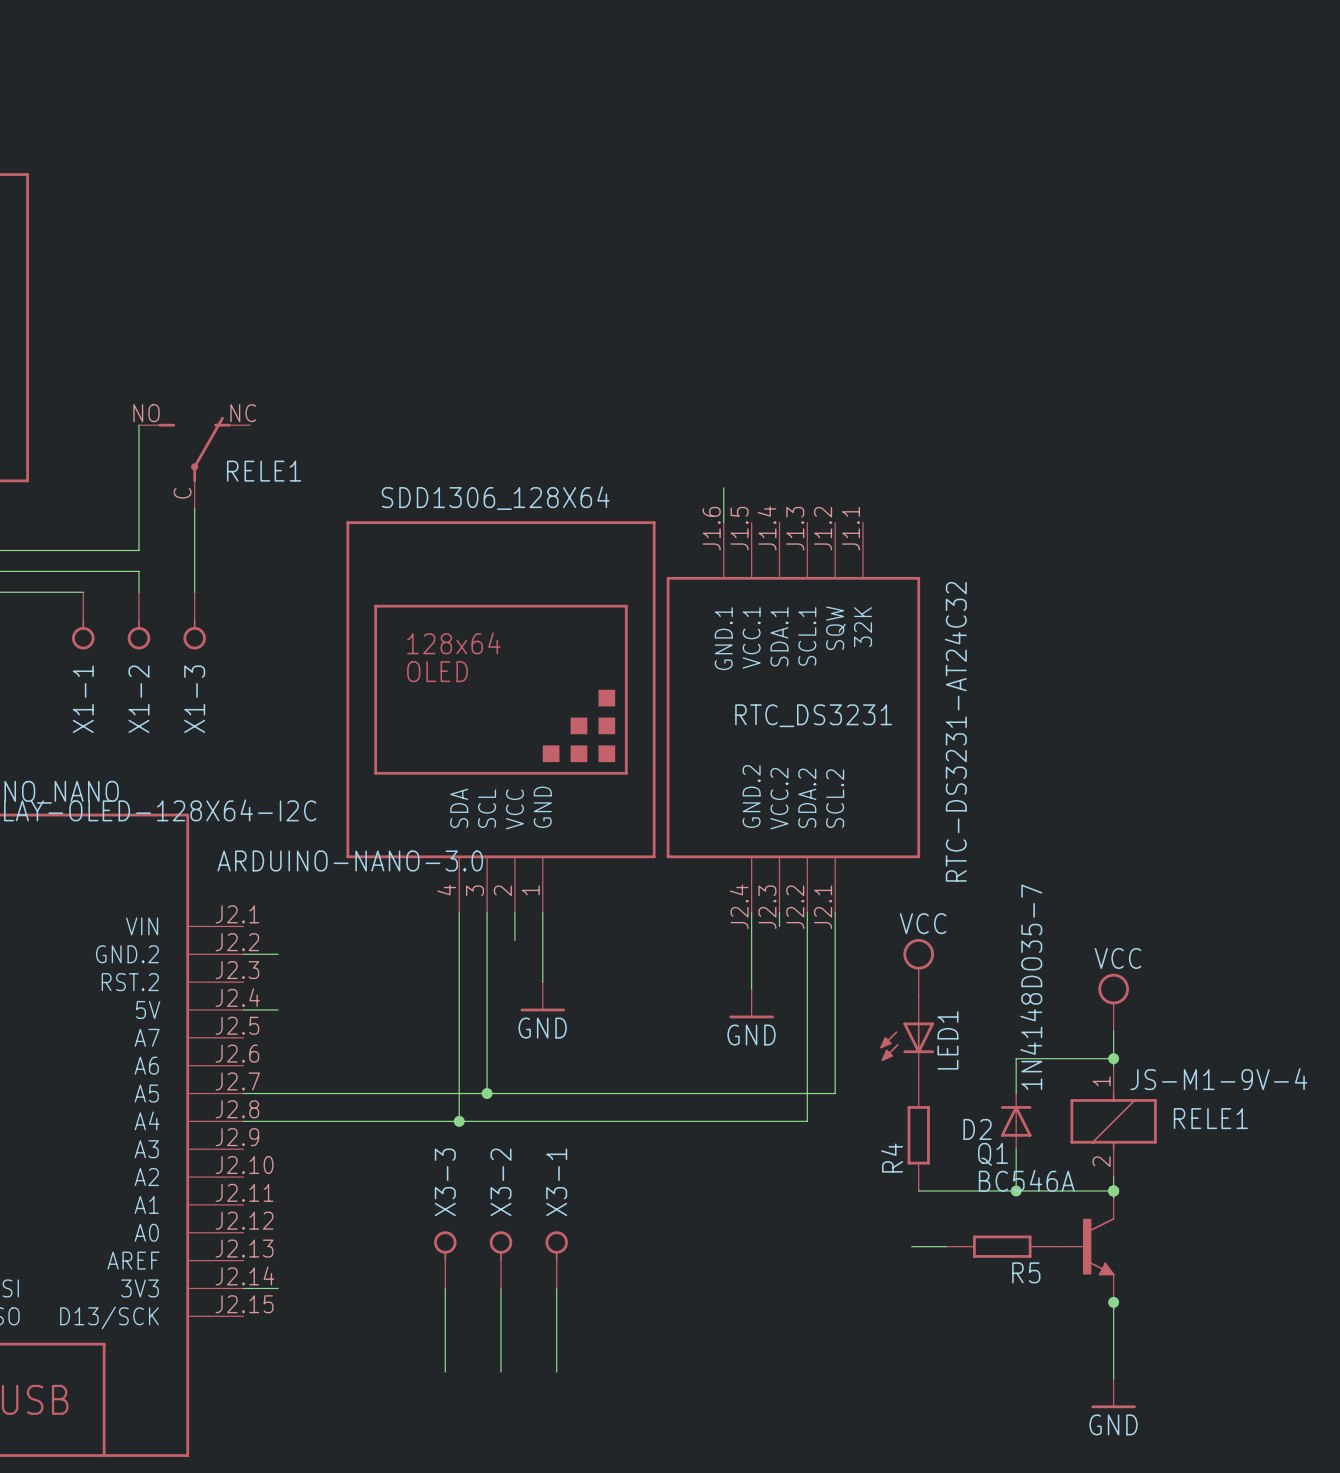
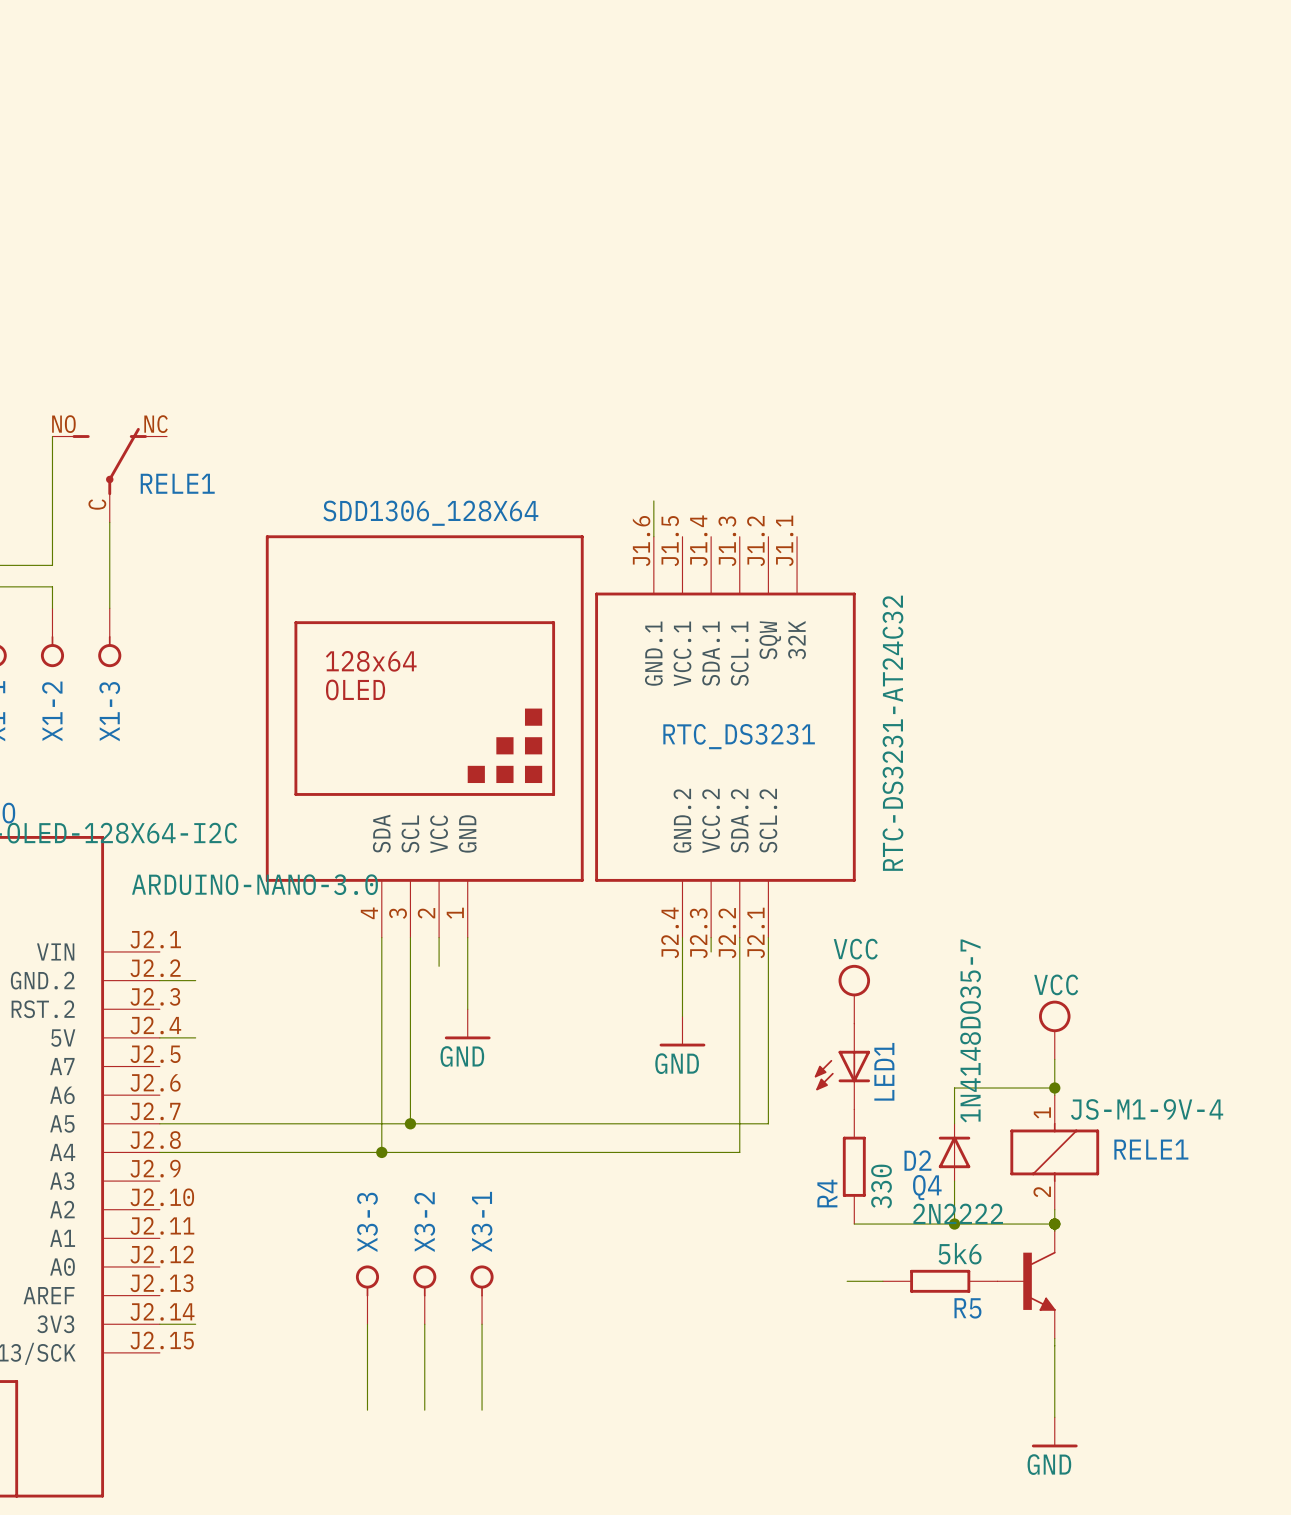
R4 value: none -> 330 (881, 1186)
Q1 name: Q1 (992, 1154) -> Q4 (927, 1187)
Q1 value: BC546A (1026, 1180) -> 2N2222 (958, 1213)
R5 value: none -> 5k6 (960, 1253)
junction: (1113, 1302) -> none

